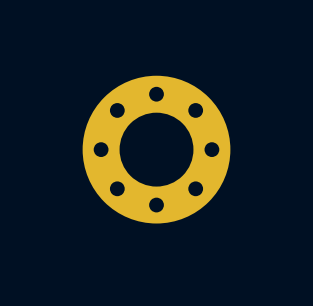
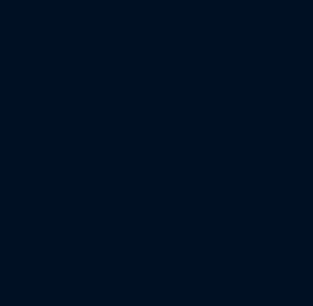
part: (156, 149) -> none

